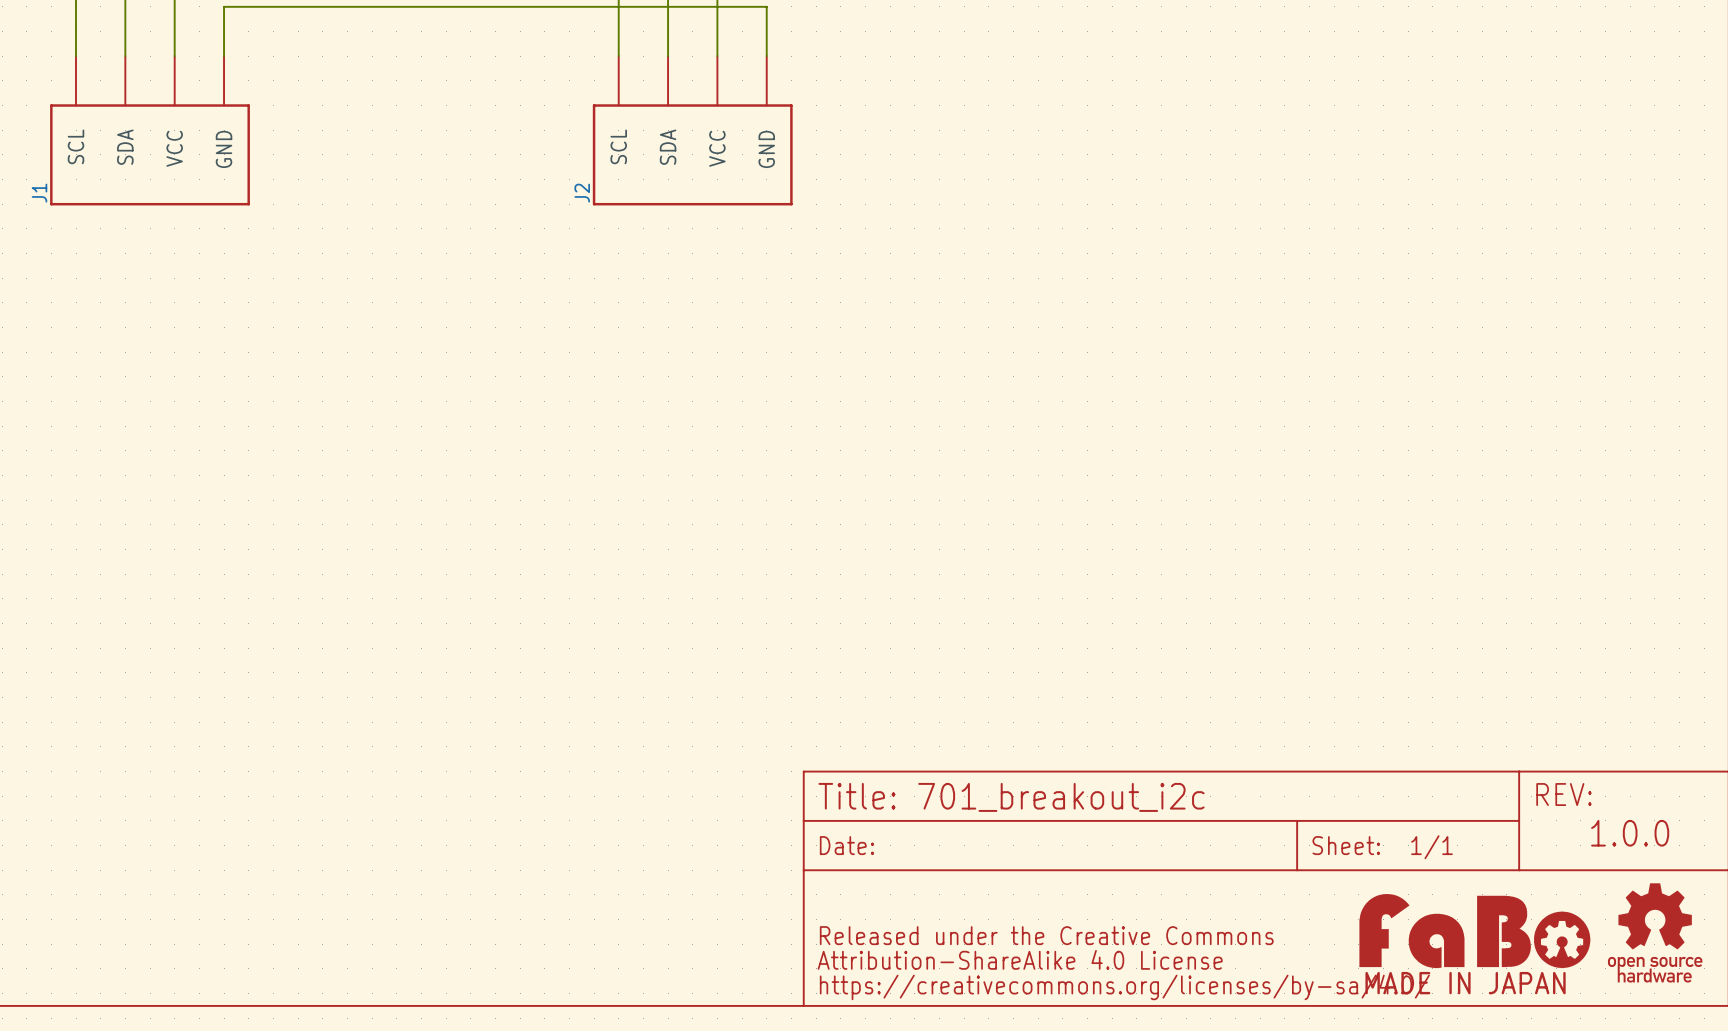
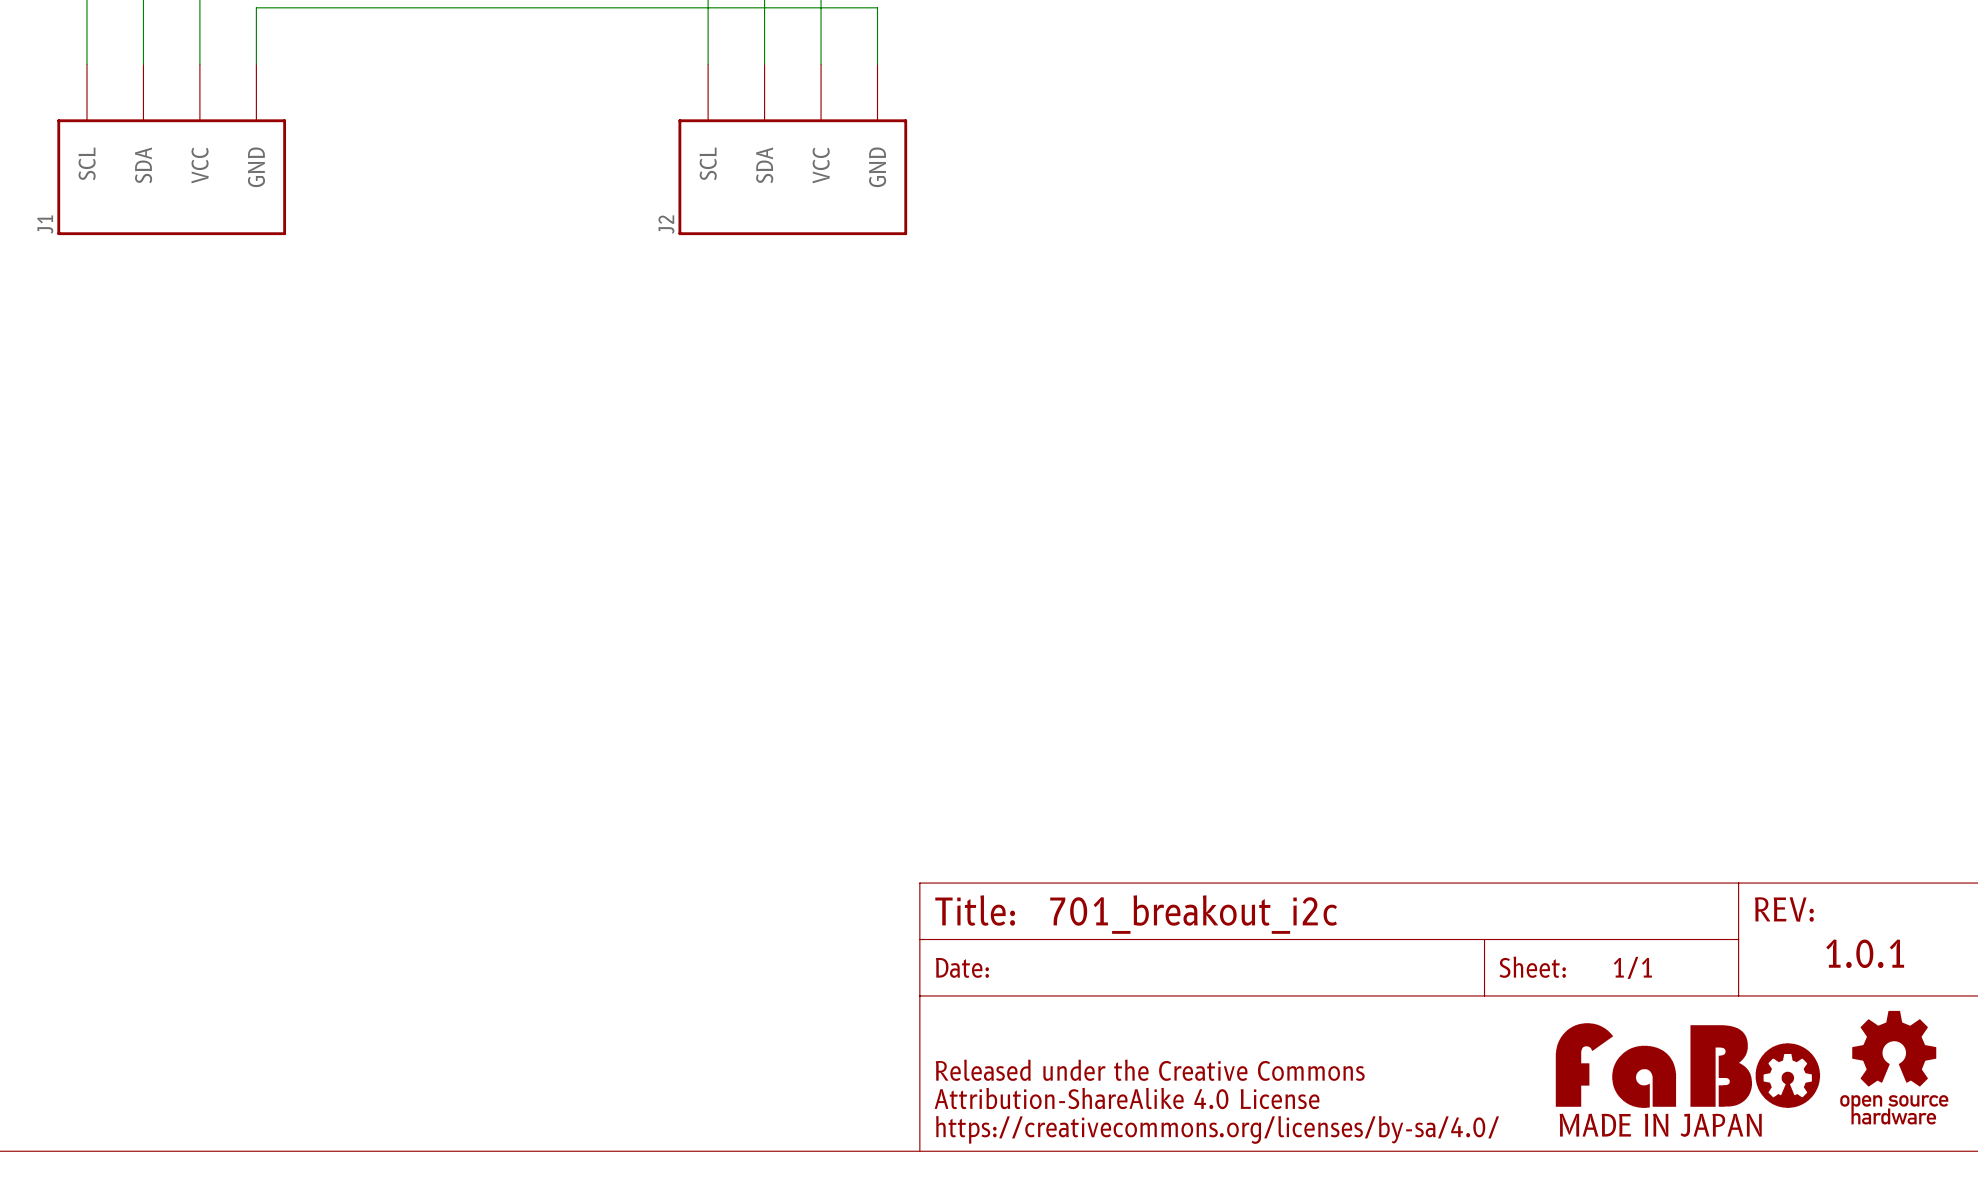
text: 1.0.0 (1630, 833) -> 1.0.1 (1865, 953)

